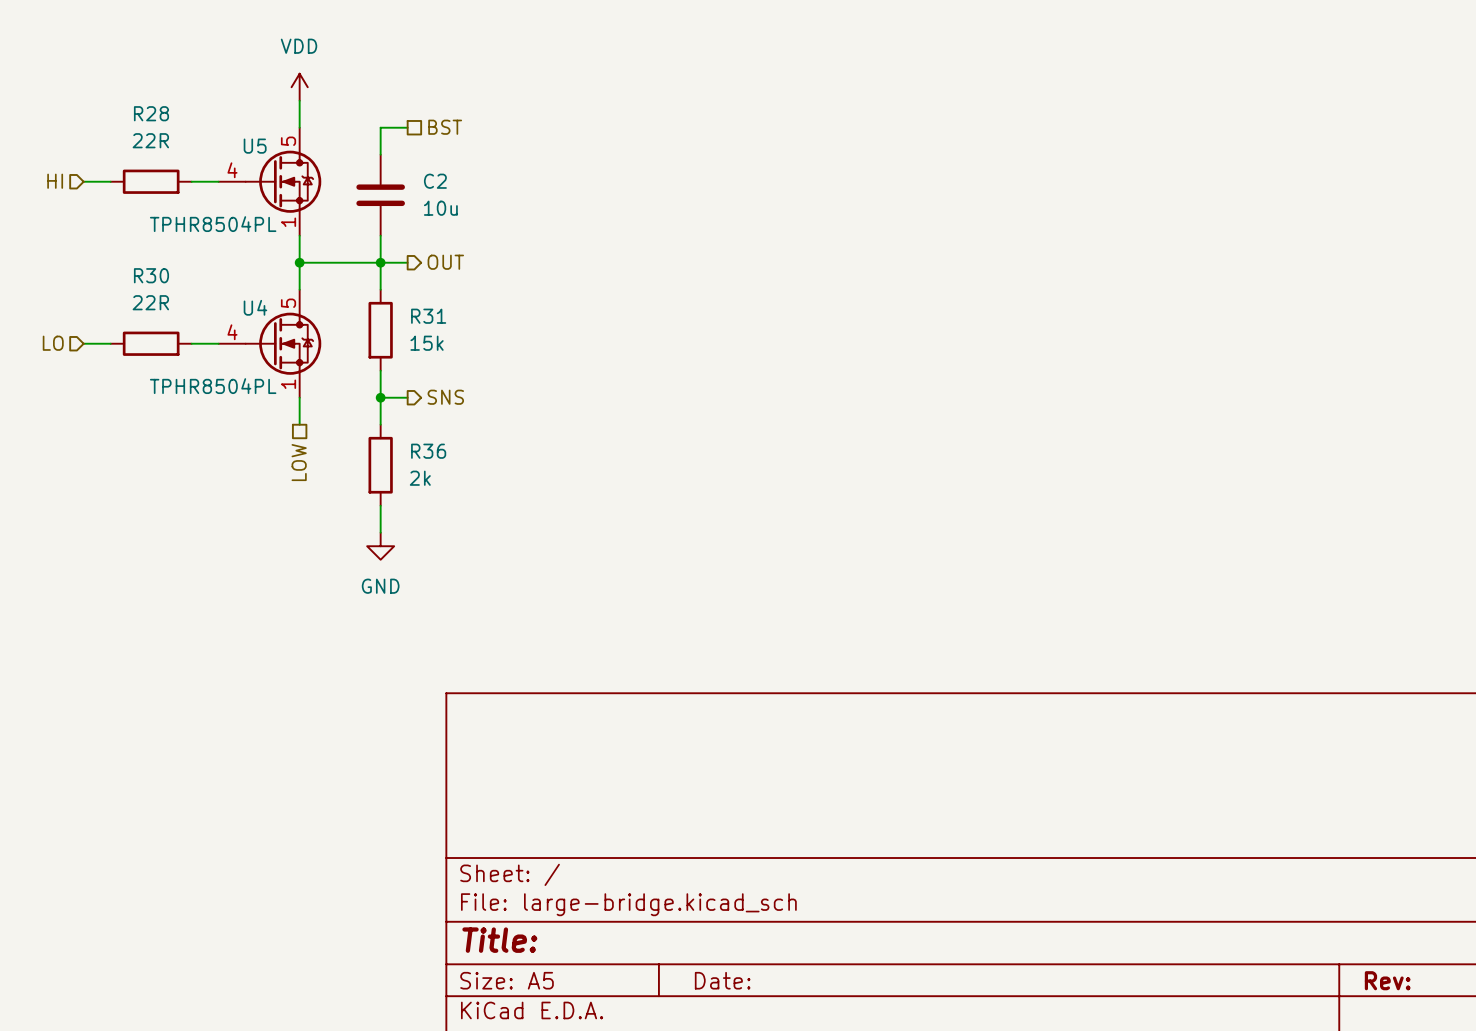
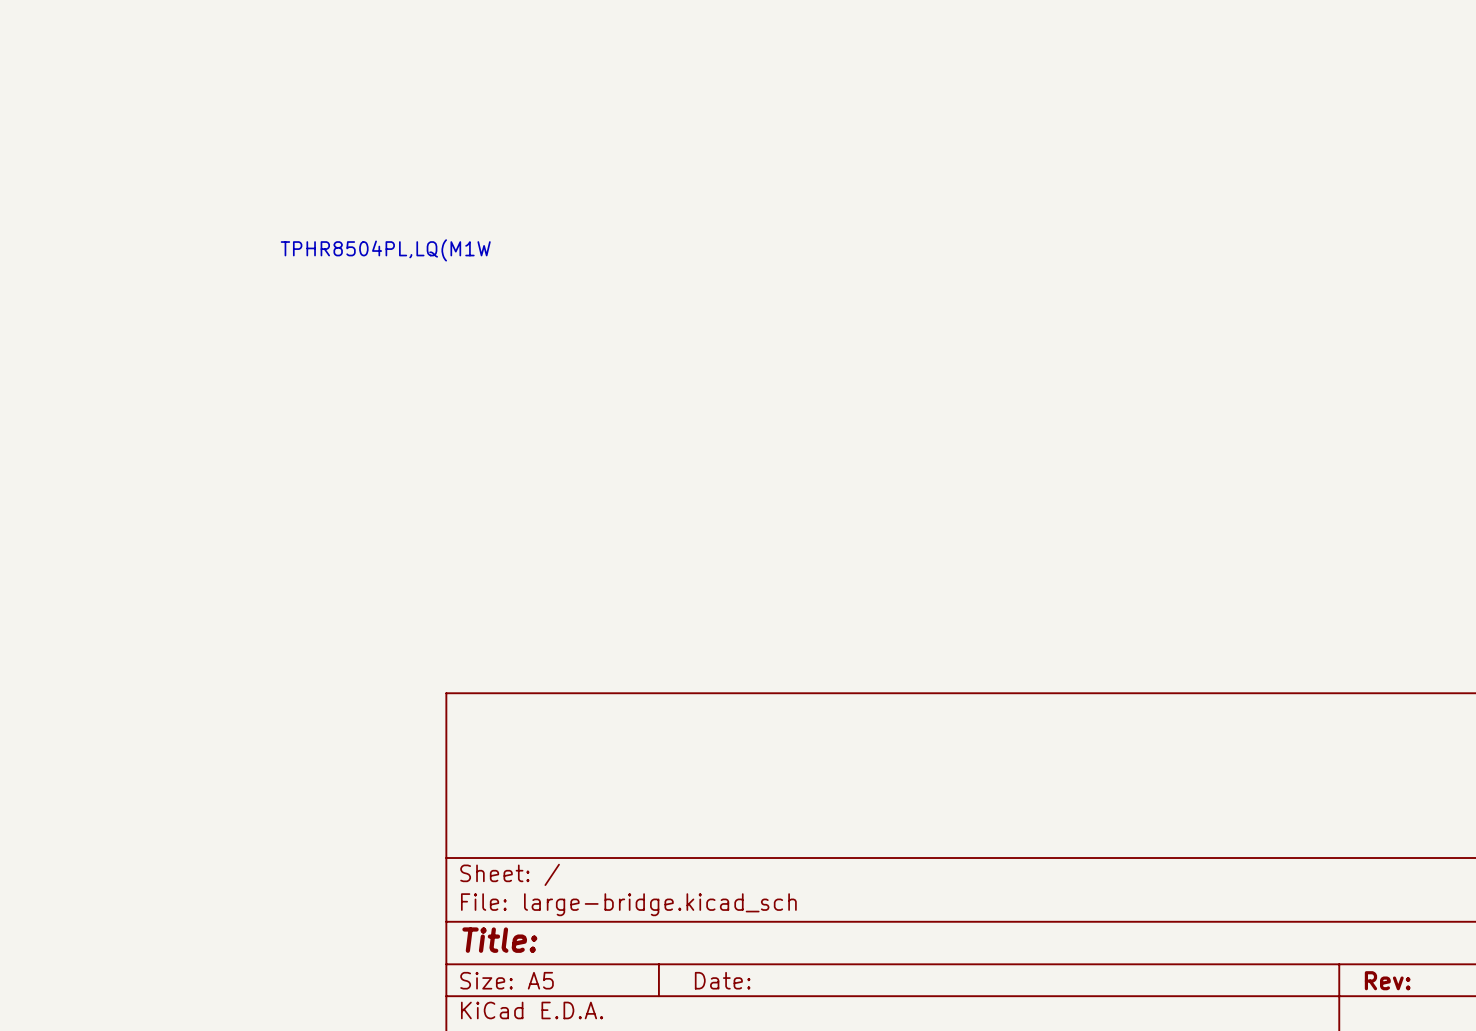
power symbol: VDD (299, 87) -> none
wire: (299, 100) (299, 127) -> none
wire: (407, 127) (380, 127) (380, 154) -> none
hierarchical label: BST (445, 127) -> none
hierarchical label: HI (55, 181) -> none
wire: (83, 181) (110, 181) -> none
R28: 22R (151, 181) -> none
wire: (191, 181) (218, 181) -> none
U5: TPHR8504PL (269, 181) -> none
C2: 10u (380, 195) -> none
wire: (299, 235) (299, 289) -> none
wire: (380, 235) (380, 289) -> none
text: none -> TPHR8504PL,LQ(M1W (385, 250)
wire: (299, 262) (407, 262) -> none
junction: (299, 262) -> none
junction: (380, 262) -> none
hierarchical label: OUT (445, 262) -> none
R31: 15k (380, 330) -> none
hierarchical label: LO (53, 343) -> none
wire: (83, 343) (110, 343) -> none
R30: 22R (151, 343) -> none
wire: (191, 343) (218, 343) -> none
U4: TPHR8504PL (269, 343) -> none
wire: (380, 370) (380, 424) -> none
wire: (299, 397) (299, 424) -> none
wire: (380, 397) (407, 397) -> none
junction: (380, 397) -> none
hierarchical label: SNS (445, 397) -> none
hierarchical label: LOW (299, 462) -> none
R36: 2k (380, 465) -> none
wire: (380, 505) (380, 532) -> none
power symbol: GND (380, 546) -> none

